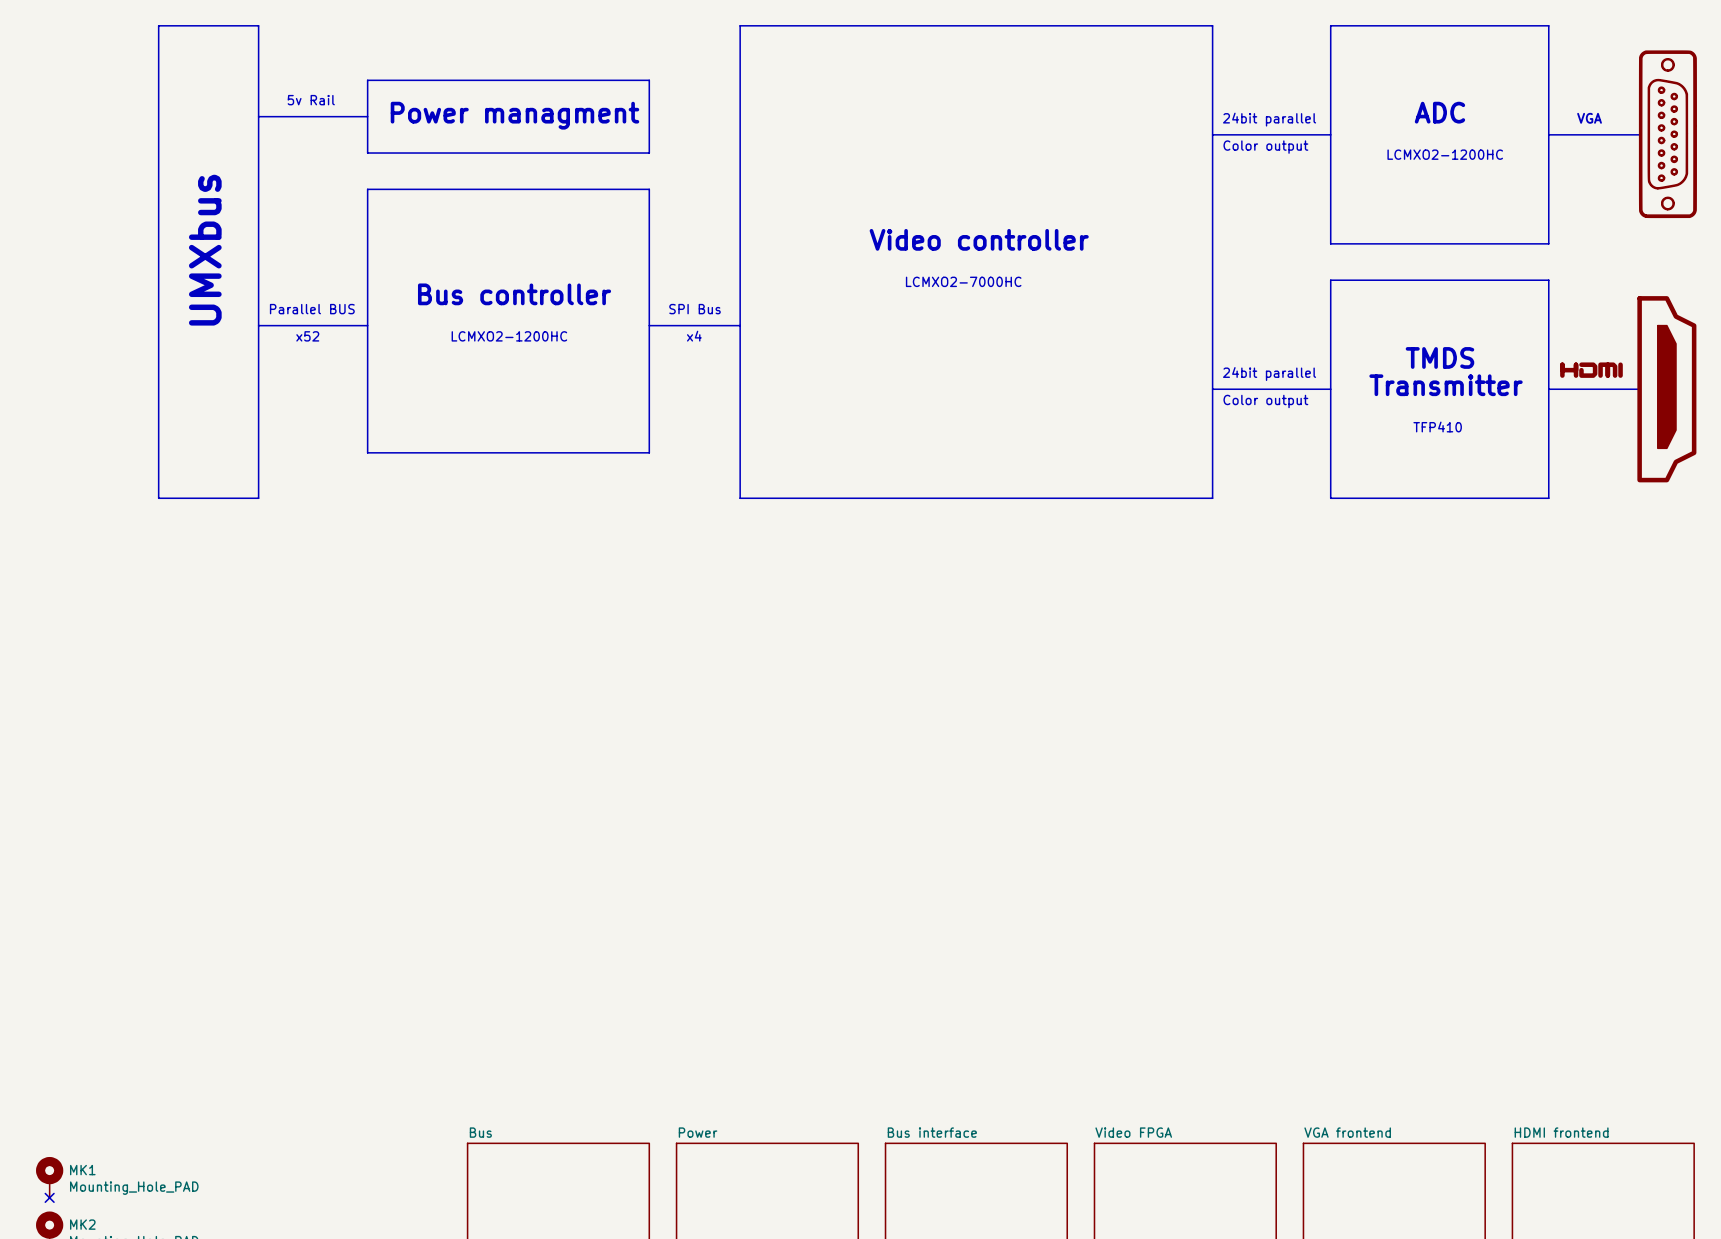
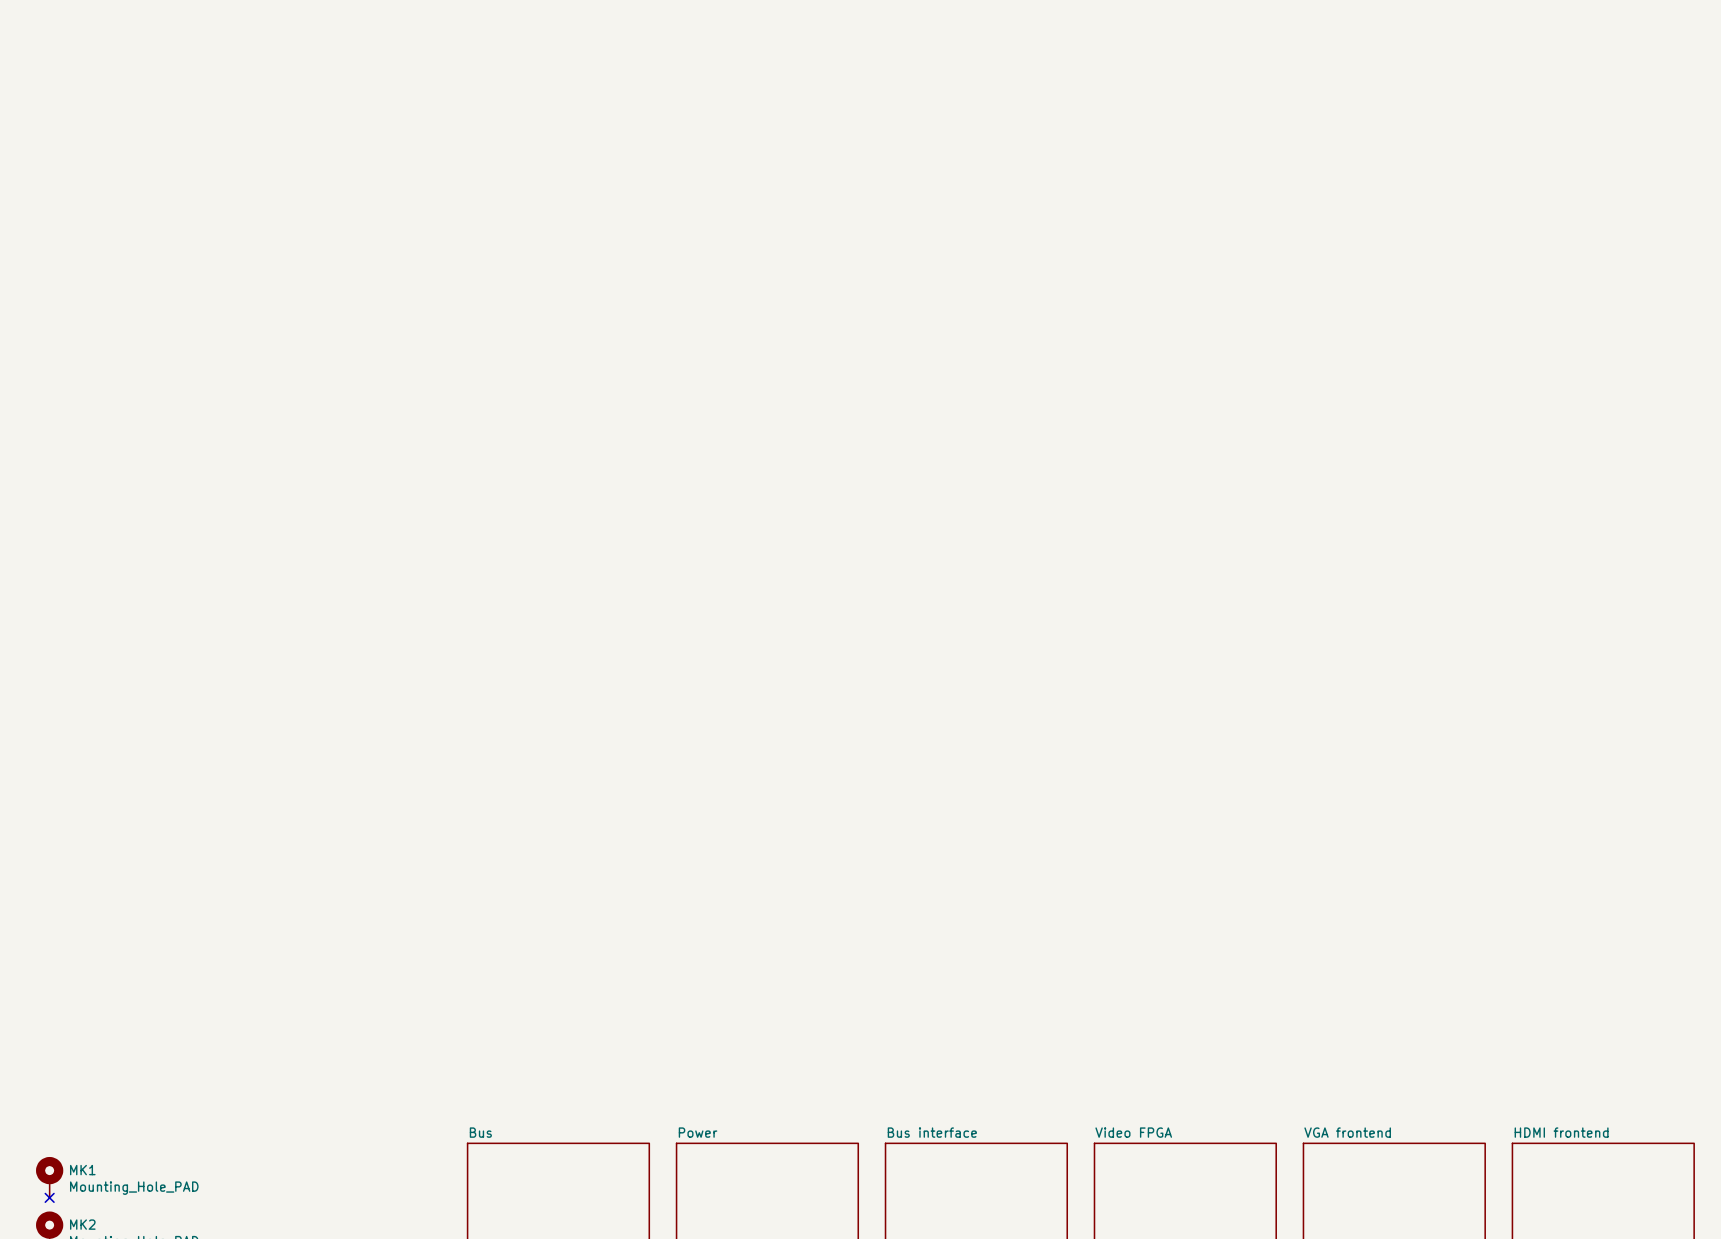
line: (158, 25) (258, 25) (258, 498) (158, 498) (158, 25) -> none
line: (740, 25) (1212, 25) (1212, 498) (740, 498) (740, 25) -> none
line: (1330, 25) (1330, 243) (1548, 243) (1548, 25) (1330, 25) -> none
line: (367, 80) (367, 153) (649, 153) (649, 80) (367, 80) -> none
text: 5v Rail (311, 100) -> none
text: ADC (1439, 112) -> none
text: Power managment (514, 115) -> none
line: (258, 116) (367, 116) -> none
text: VGA (1589, 118) -> none
text: 24bit parallel (1269, 119) -> none
line: (1212, 134) (1330, 134) -> none
line: (1548, 134) (1639, 134) -> none
power symbol: (1667, 134) -> none
text: Color output (1265, 147) -> none
text: LCMXO2-1200HC (1445, 154) -> none
line: (367, 189) (649, 189) (649, 452) (367, 452) (367, 189) -> none
text: Video controller (979, 239) -> none
text: UMXbus (205, 250) -> none
line: (1330, 280) (1548, 280) (1548, 498) (1330, 498) (1330, 280) -> none
text: LCMXO2-7000HC (963, 281) -> none
text: Bus controller (514, 294) -> none
text: Parallel BUS (312, 309) -> none
text: SPI Bus (695, 309) -> none
line: (258, 325) (367, 325) -> none
line: (649, 325) (740, 325) -> none
text: x52 (307, 336) -> none
text: LCMXO2-1200HC (509, 336) -> none
text: x4 (694, 336) -> none
text: TMDS (1439, 357) -> none
text: 24bit parallel (1269, 374) -> none
text: Transmitter (1446, 385) -> none
line: (1212, 389) (1330, 389) -> none
line: (1548, 389) (1639, 389) -> none
part: (1628, 389) -> none
text: Color output (1265, 401) -> none
text: TFP410 (1437, 427) -> none

